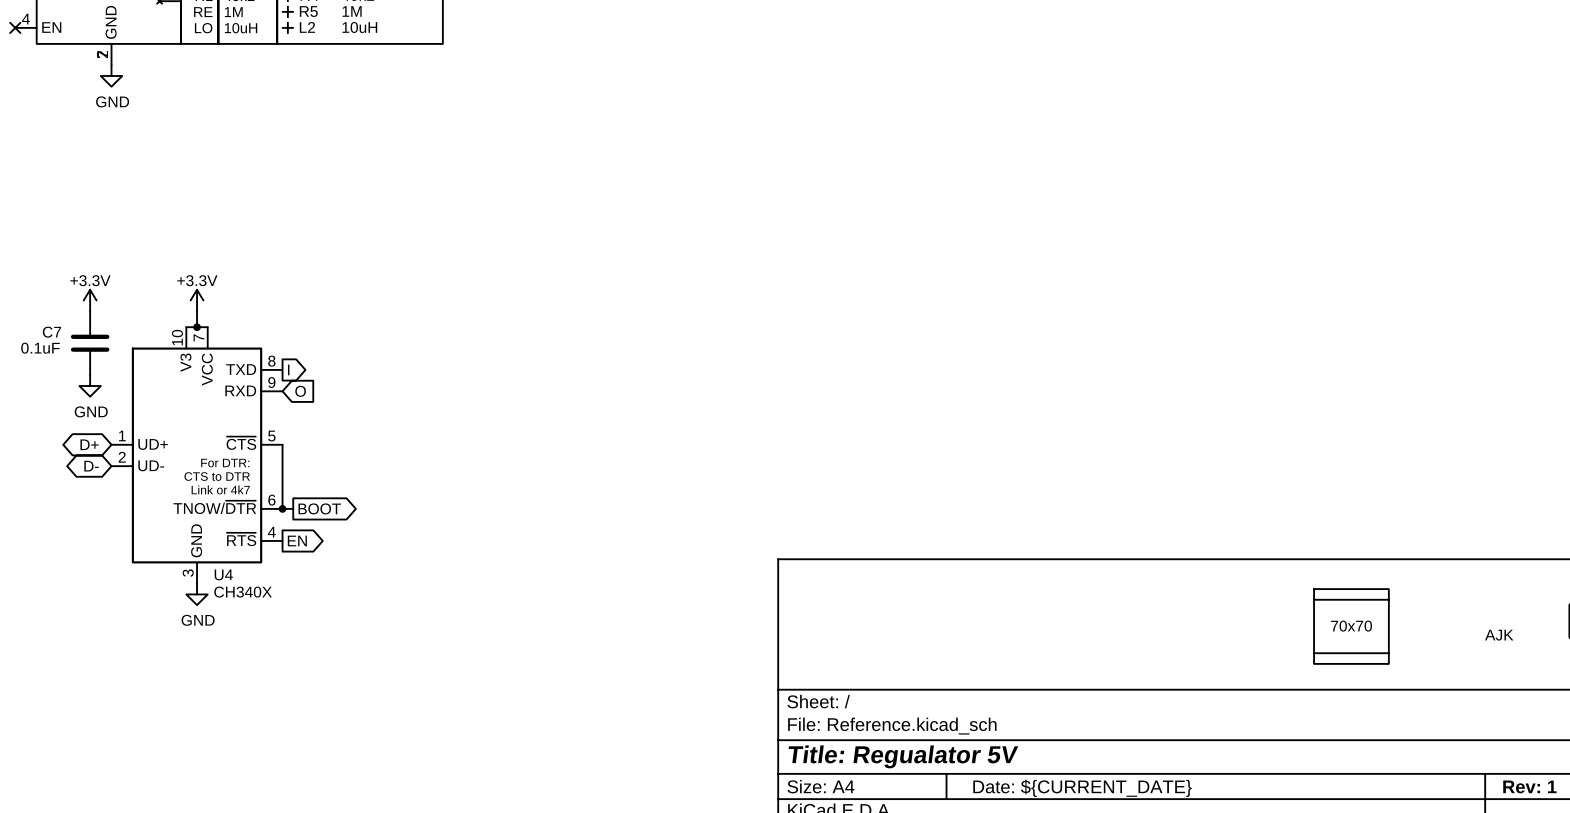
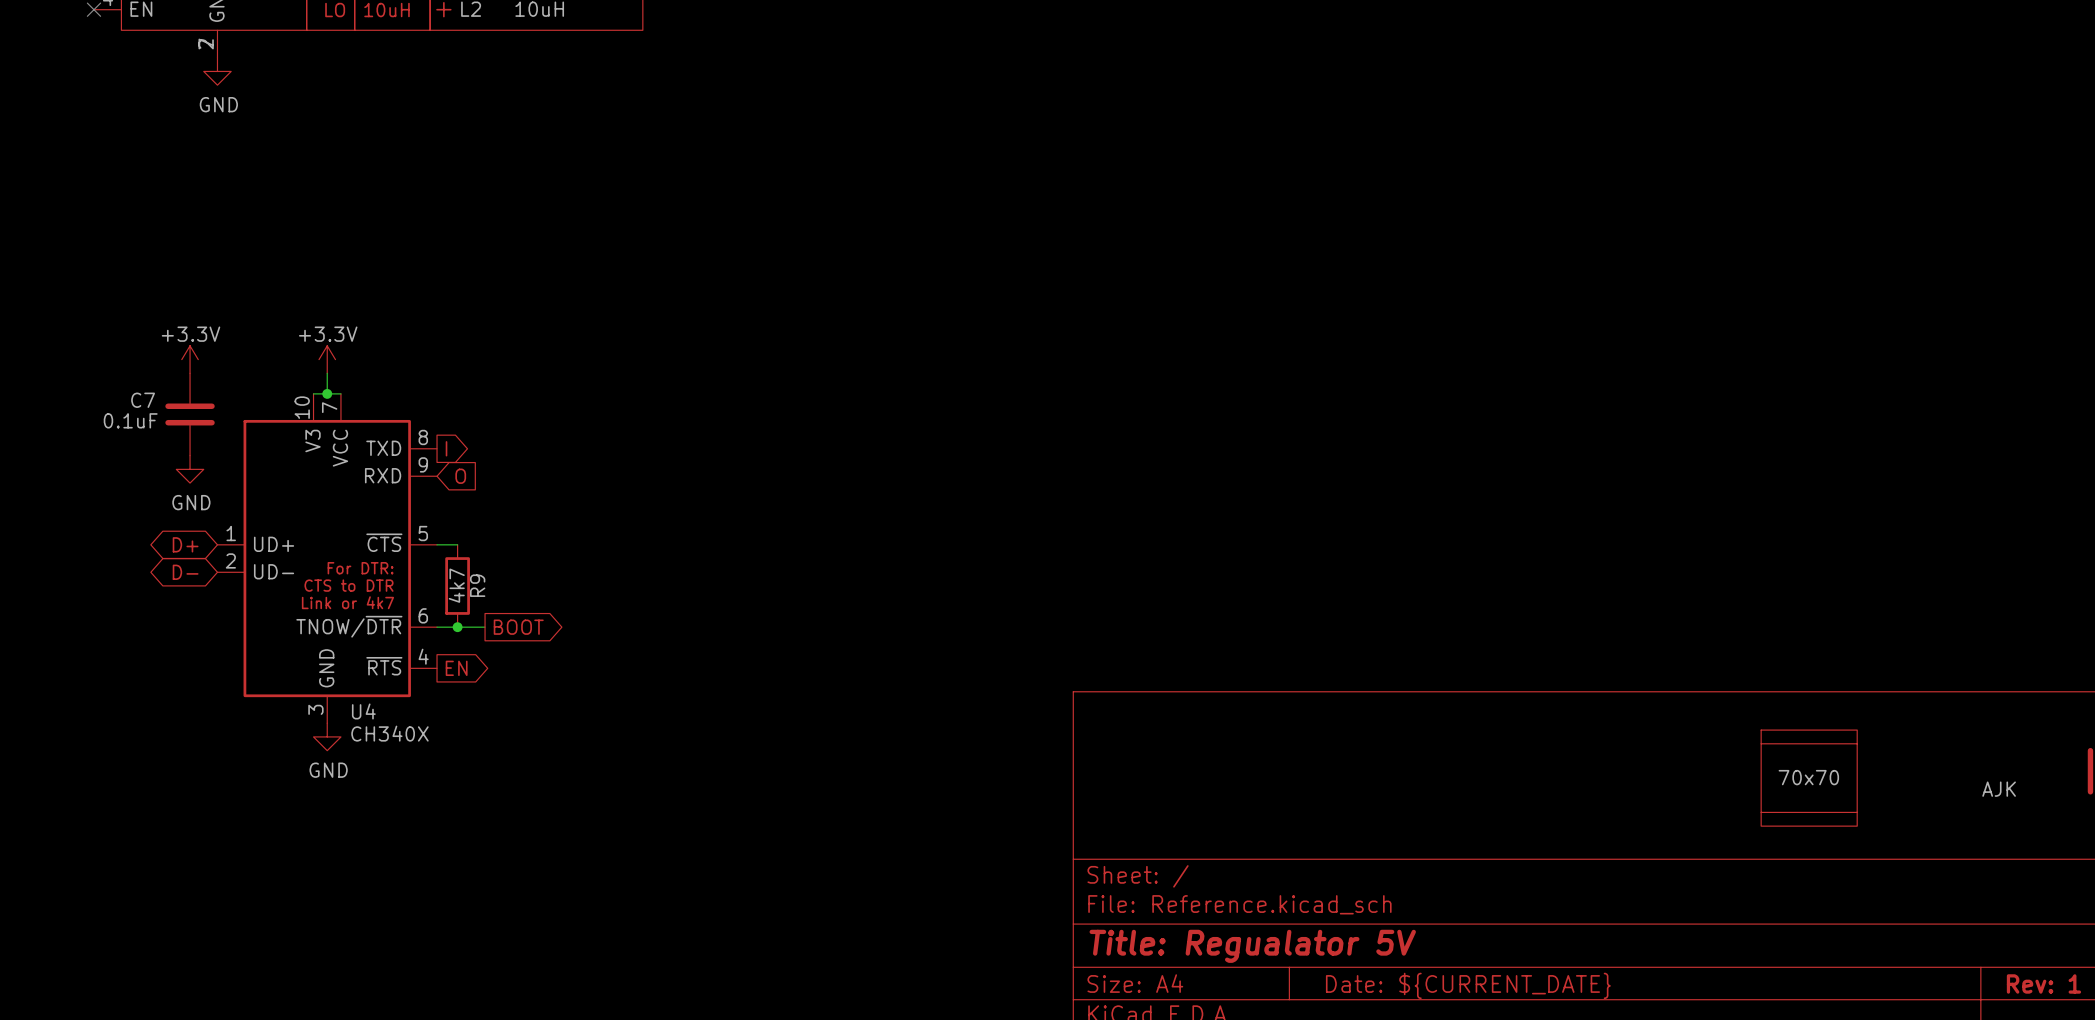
wire: (282, 444) (282, 508) -> (437, 544) (457, 544)
R9: none -> 4k7 (457, 586)
junction position: (282, 508) -> (457, 627)
wire: none -> (450, 627) (485, 627)
global label position: BOOT (319, 508) -> BOOT (518, 627)

